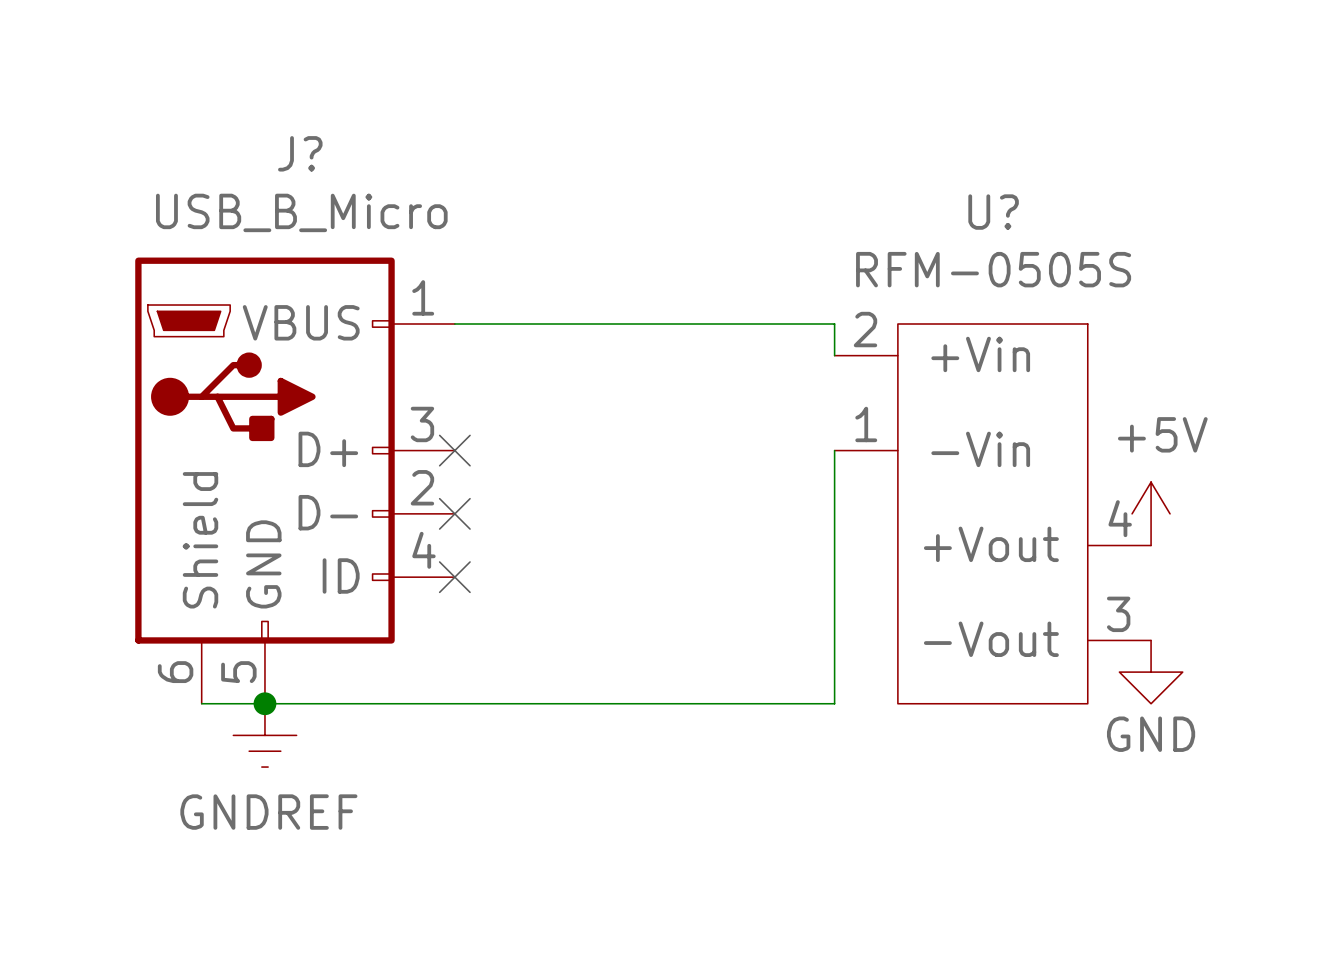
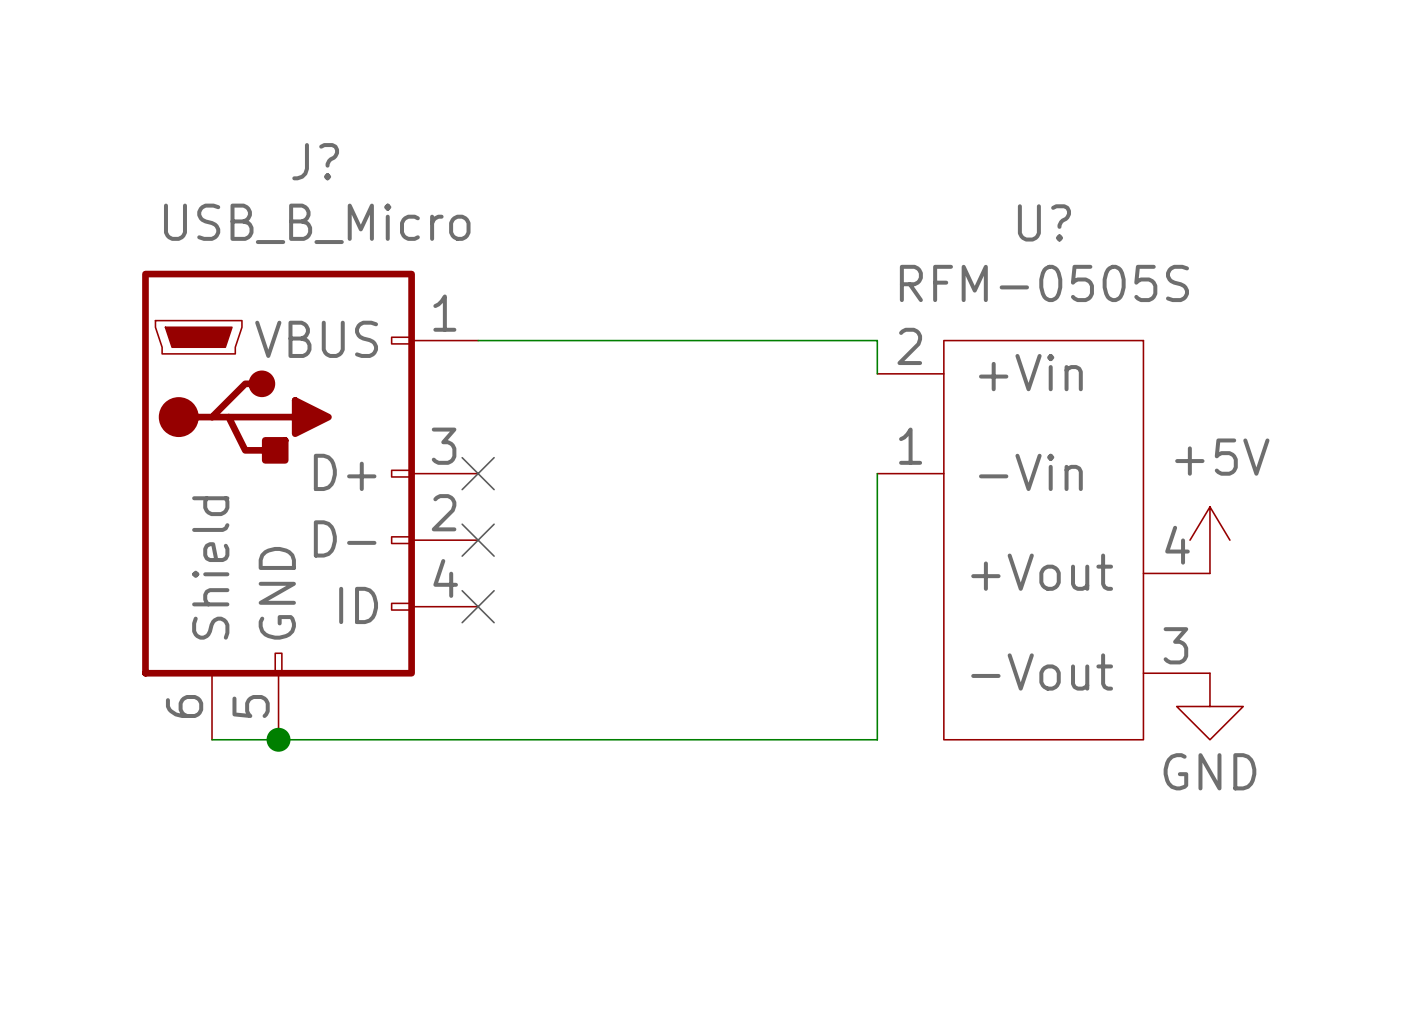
power symbol: GNDREF (264, 735) -> none

